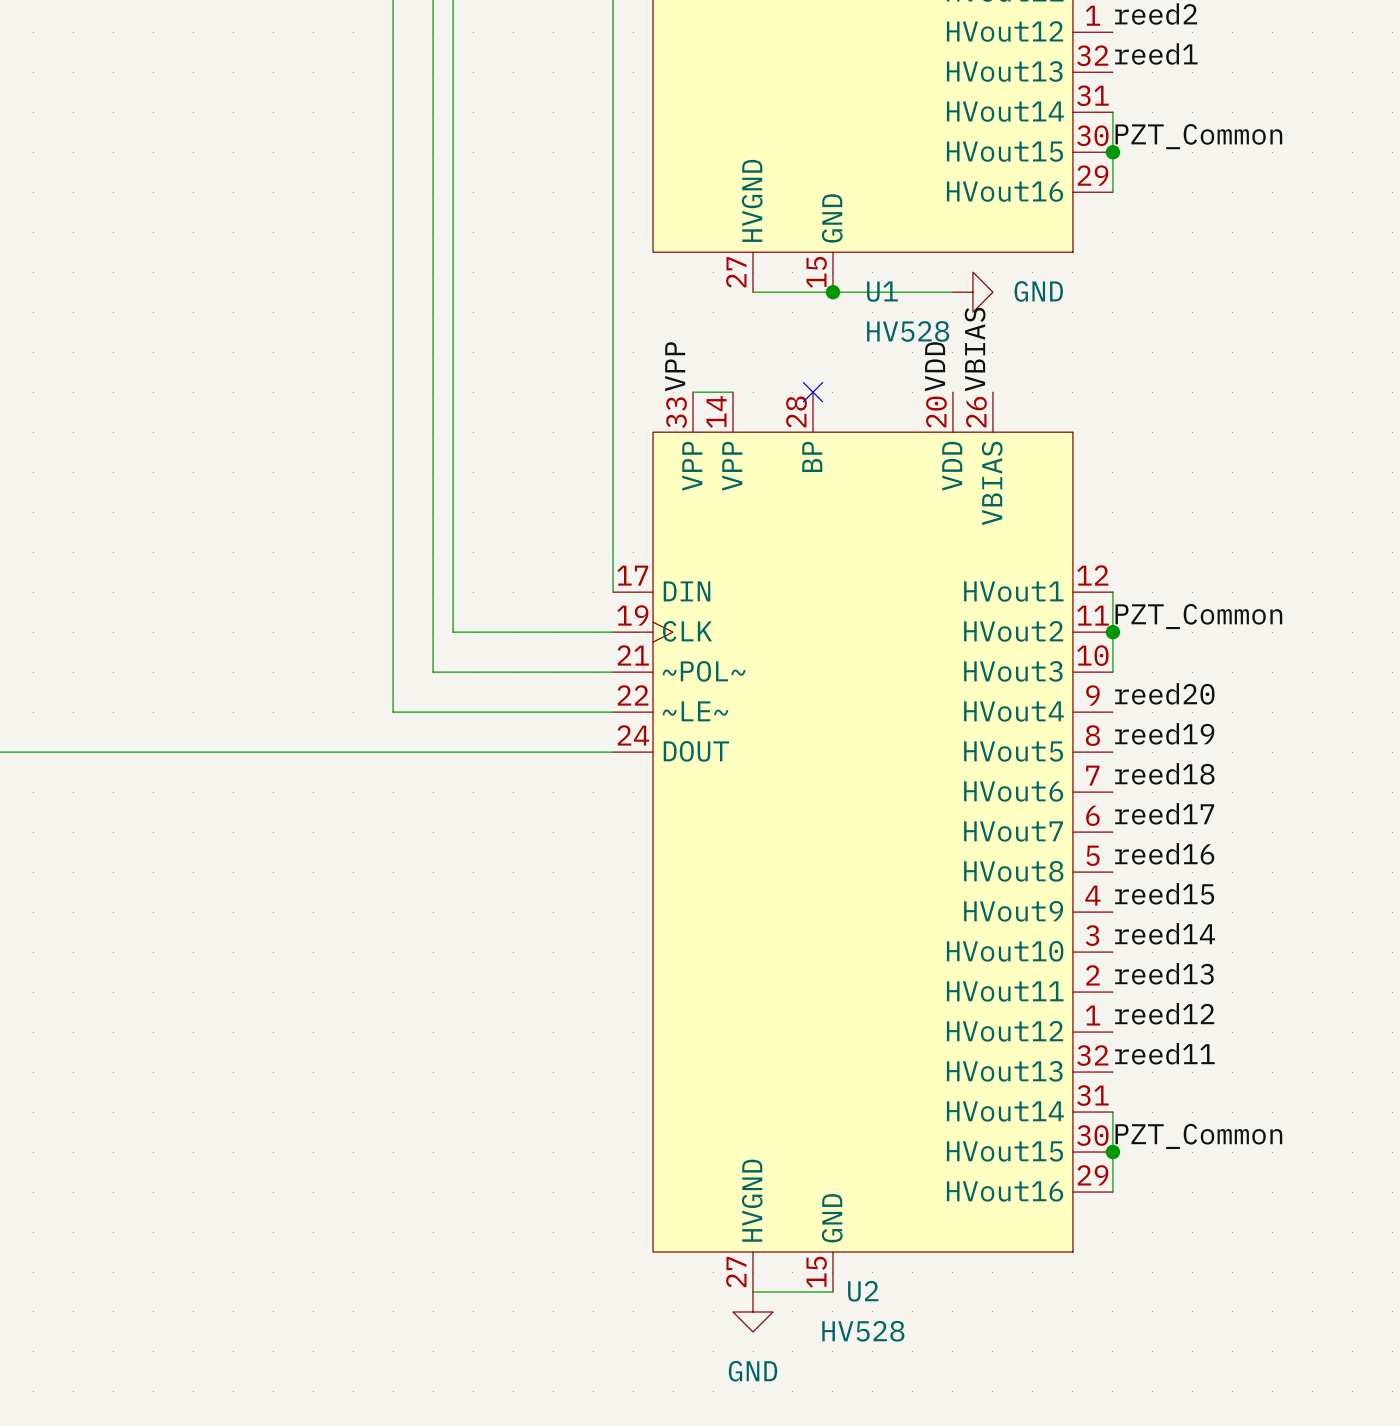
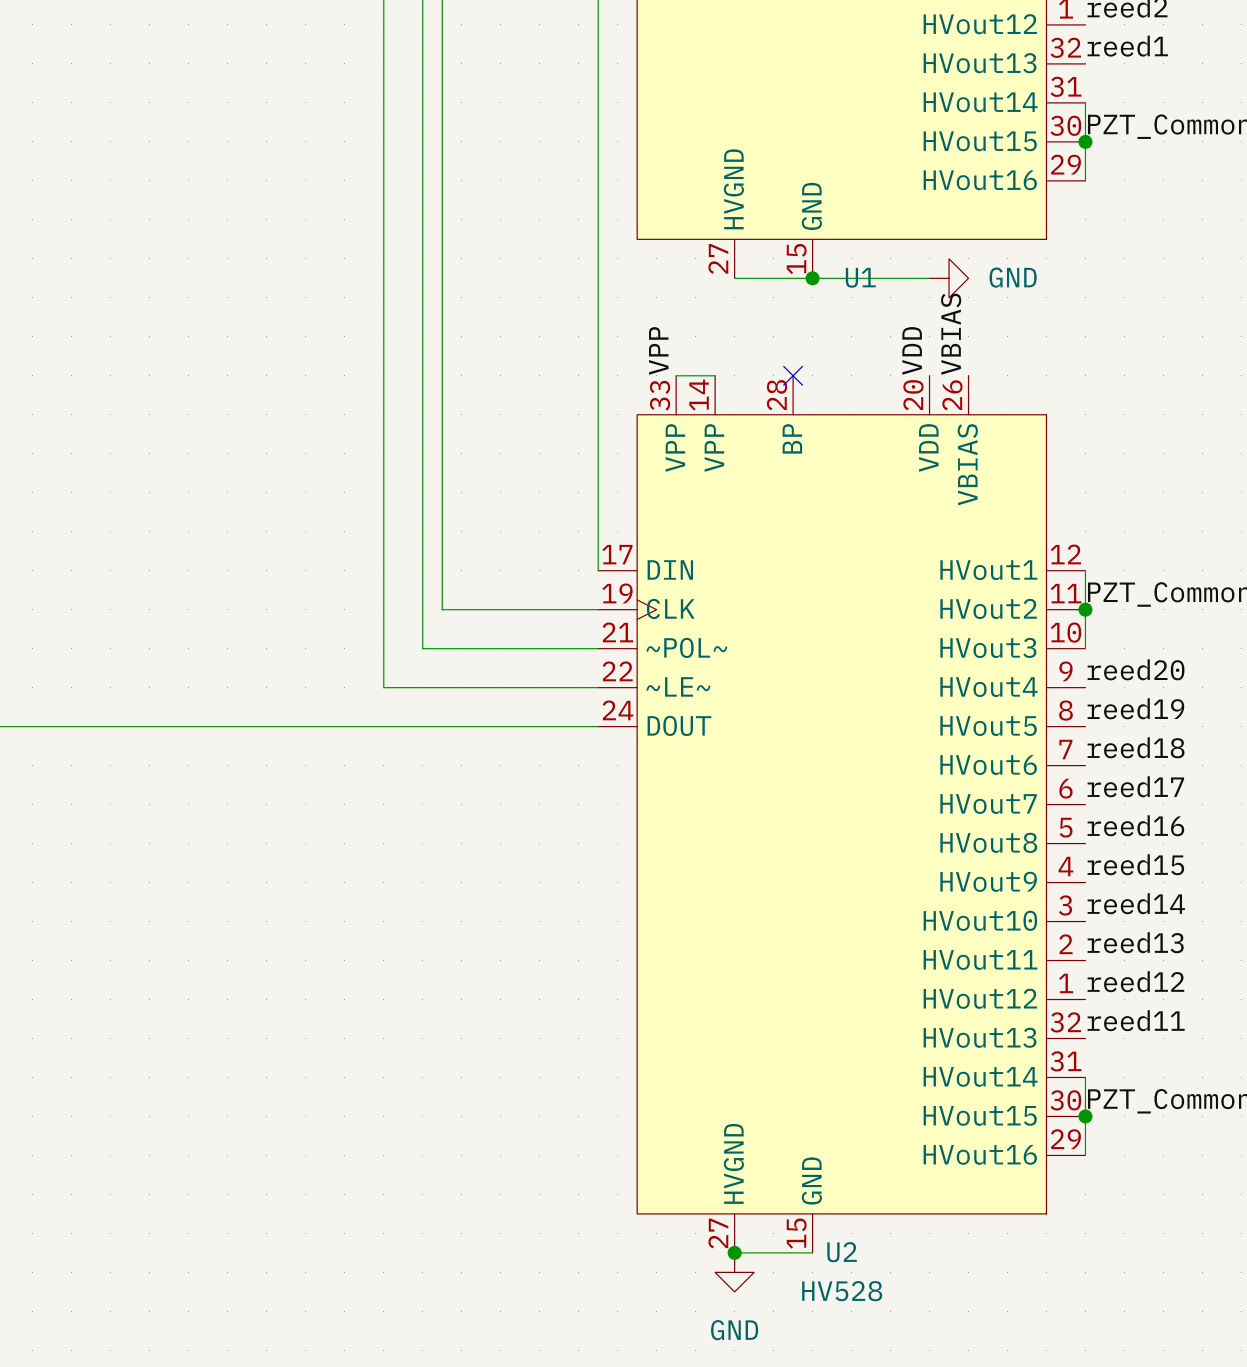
U1 value: HV528 (908, 331) -> none
junction: none -> (734, 1252)

